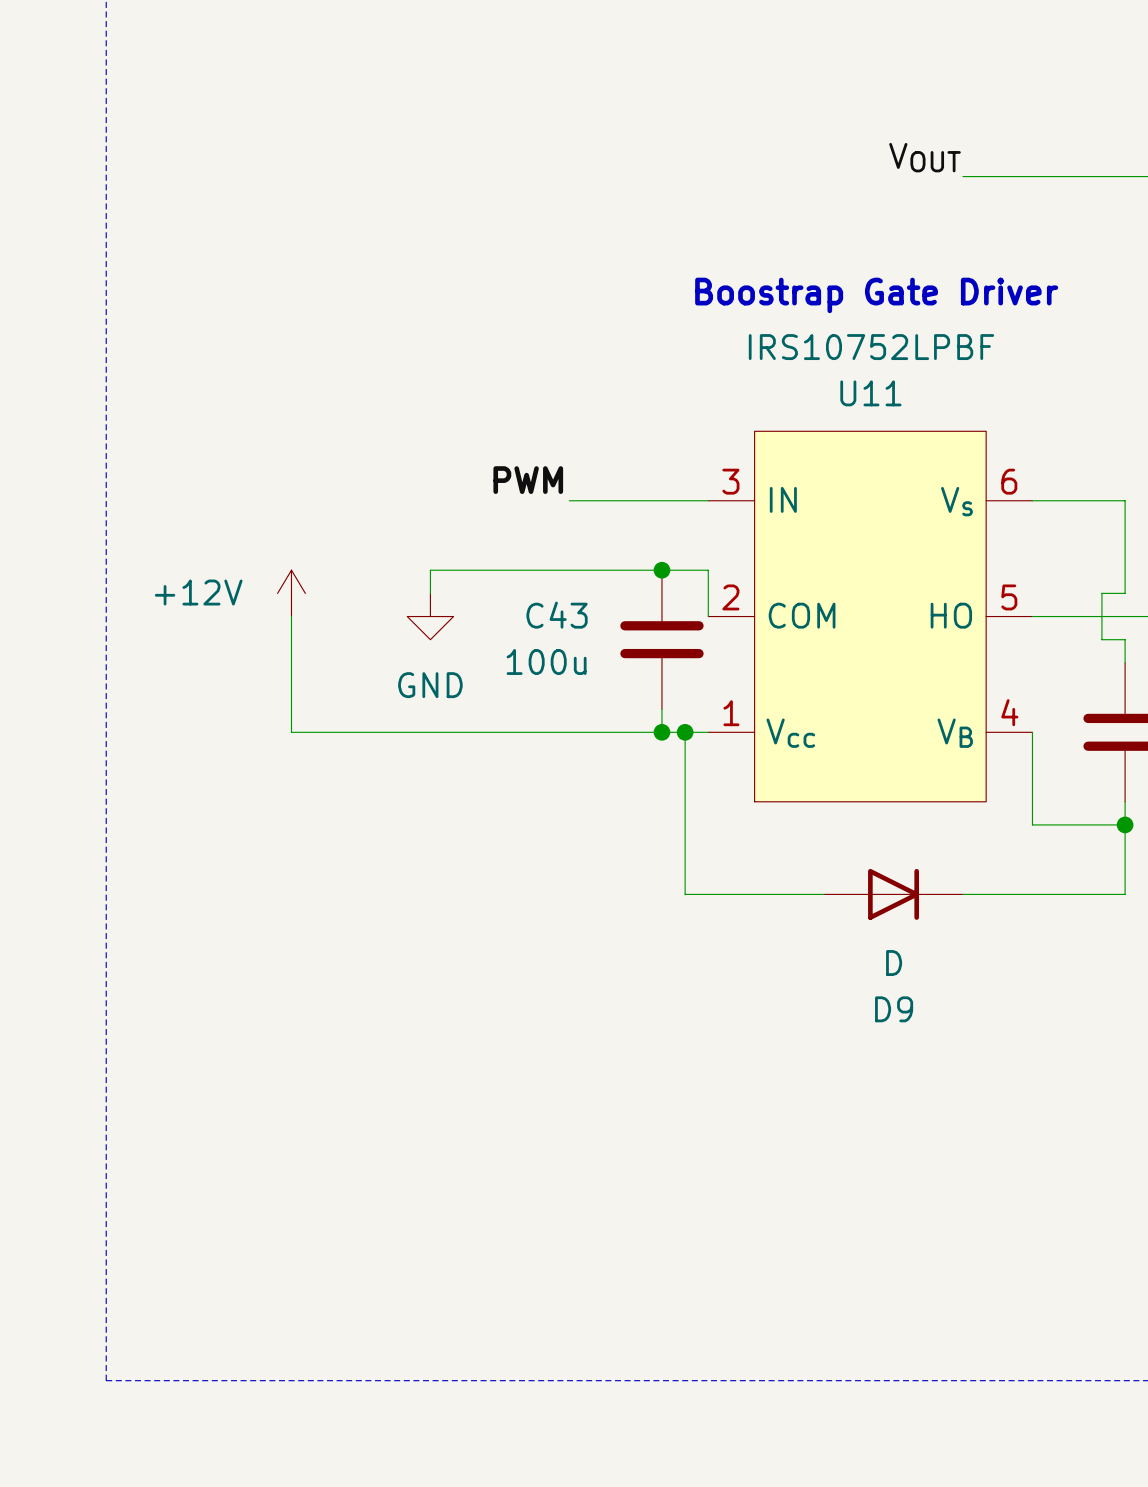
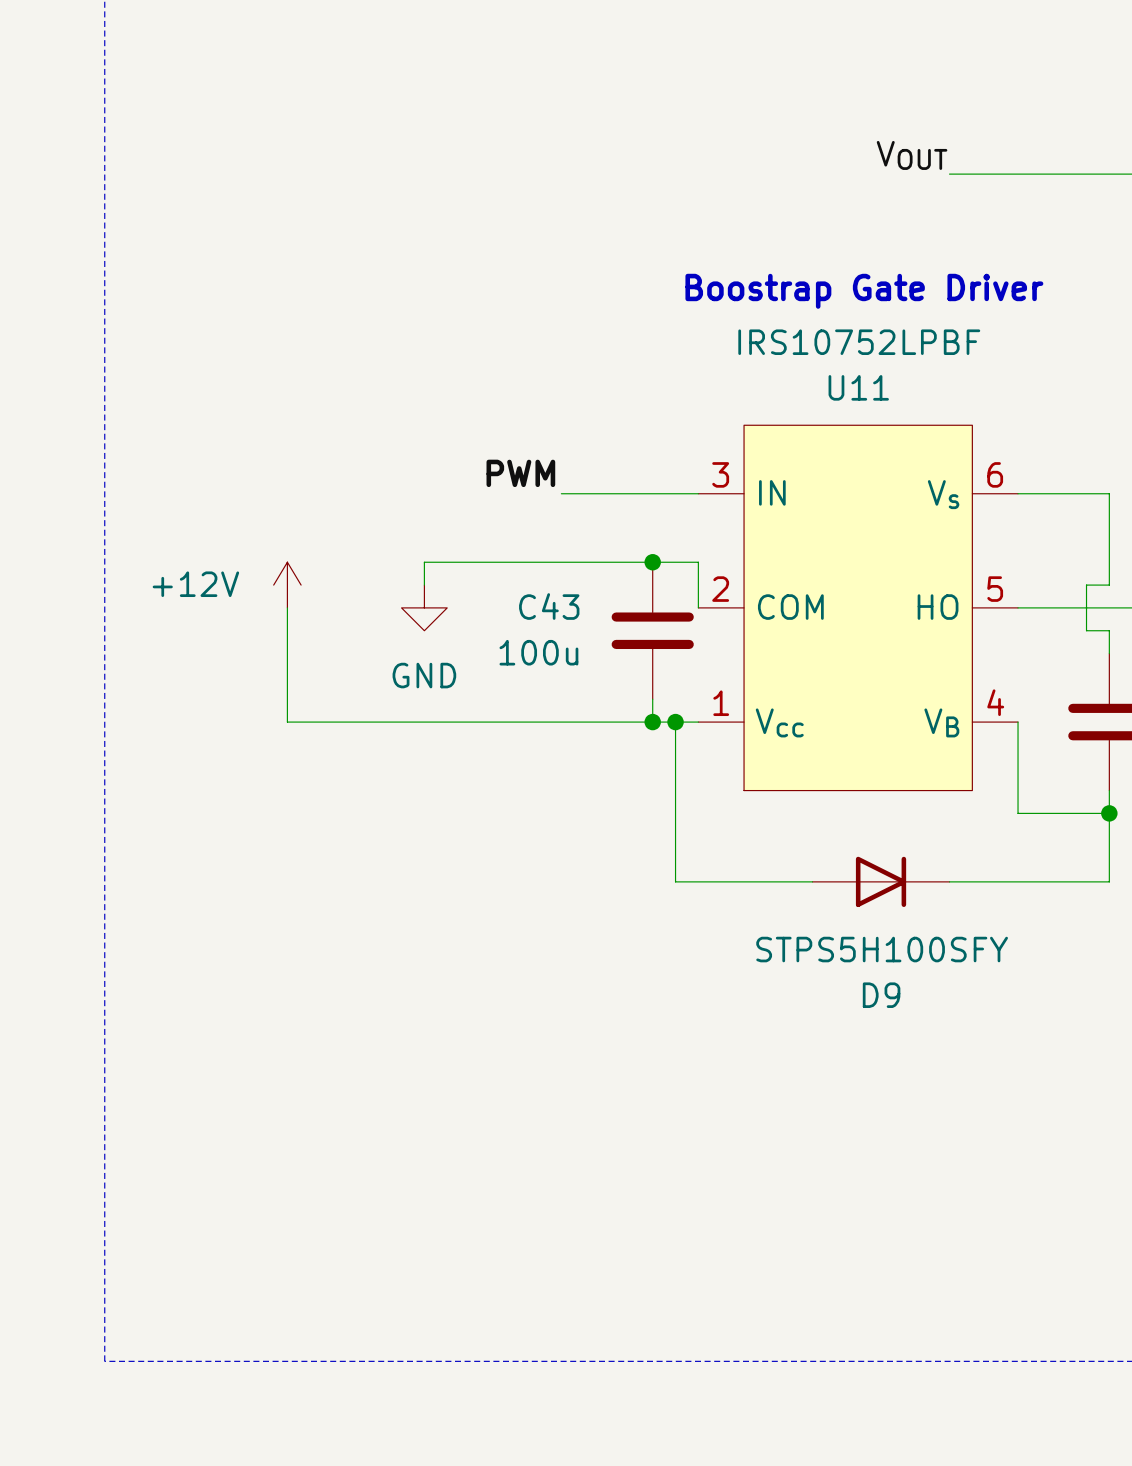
D9 value: D (894, 963) -> STPS5H100SFY (882, 949)

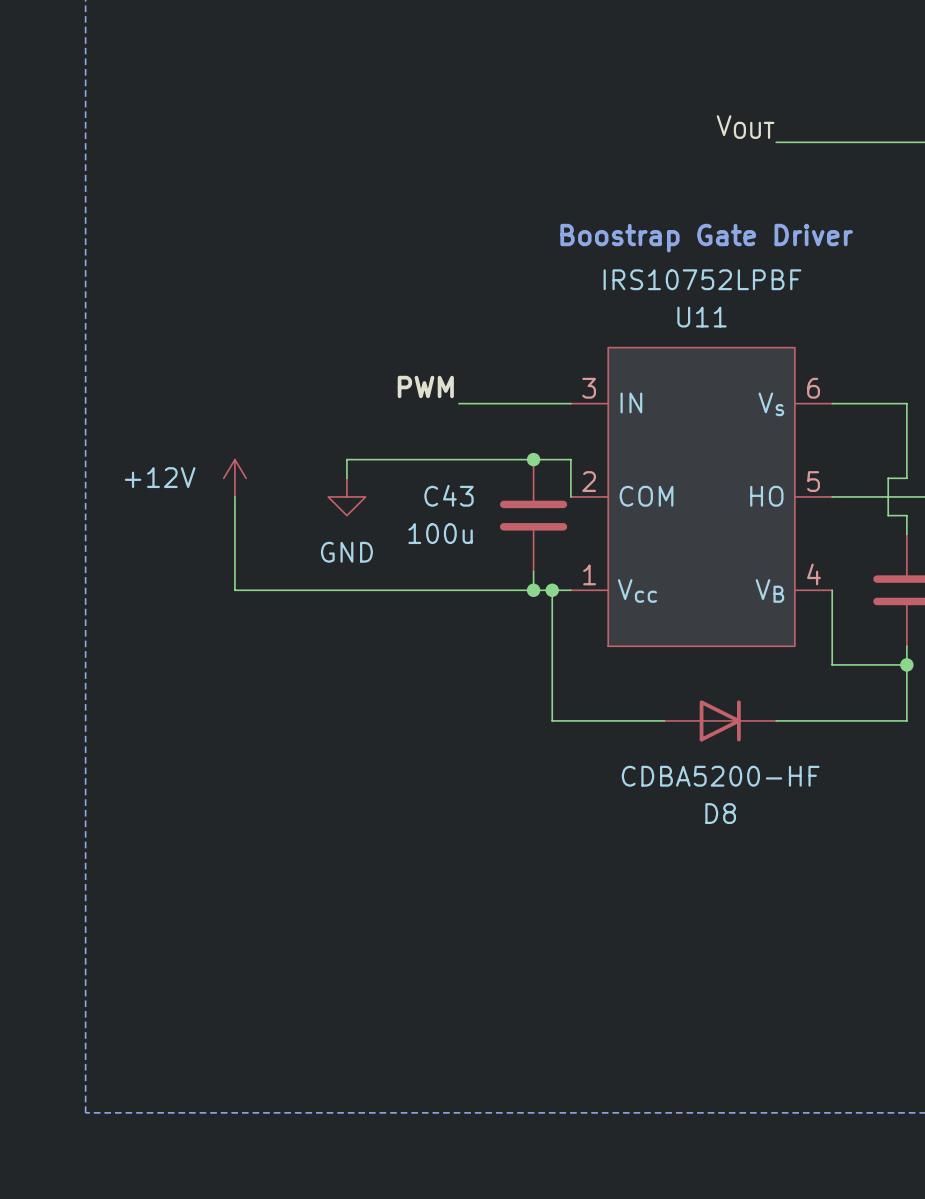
D9 value: STPS5H100SFY (882, 949) -> CDBA5200-HF (720, 776)
D9 name: D9 (881, 995) -> D8 (720, 813)

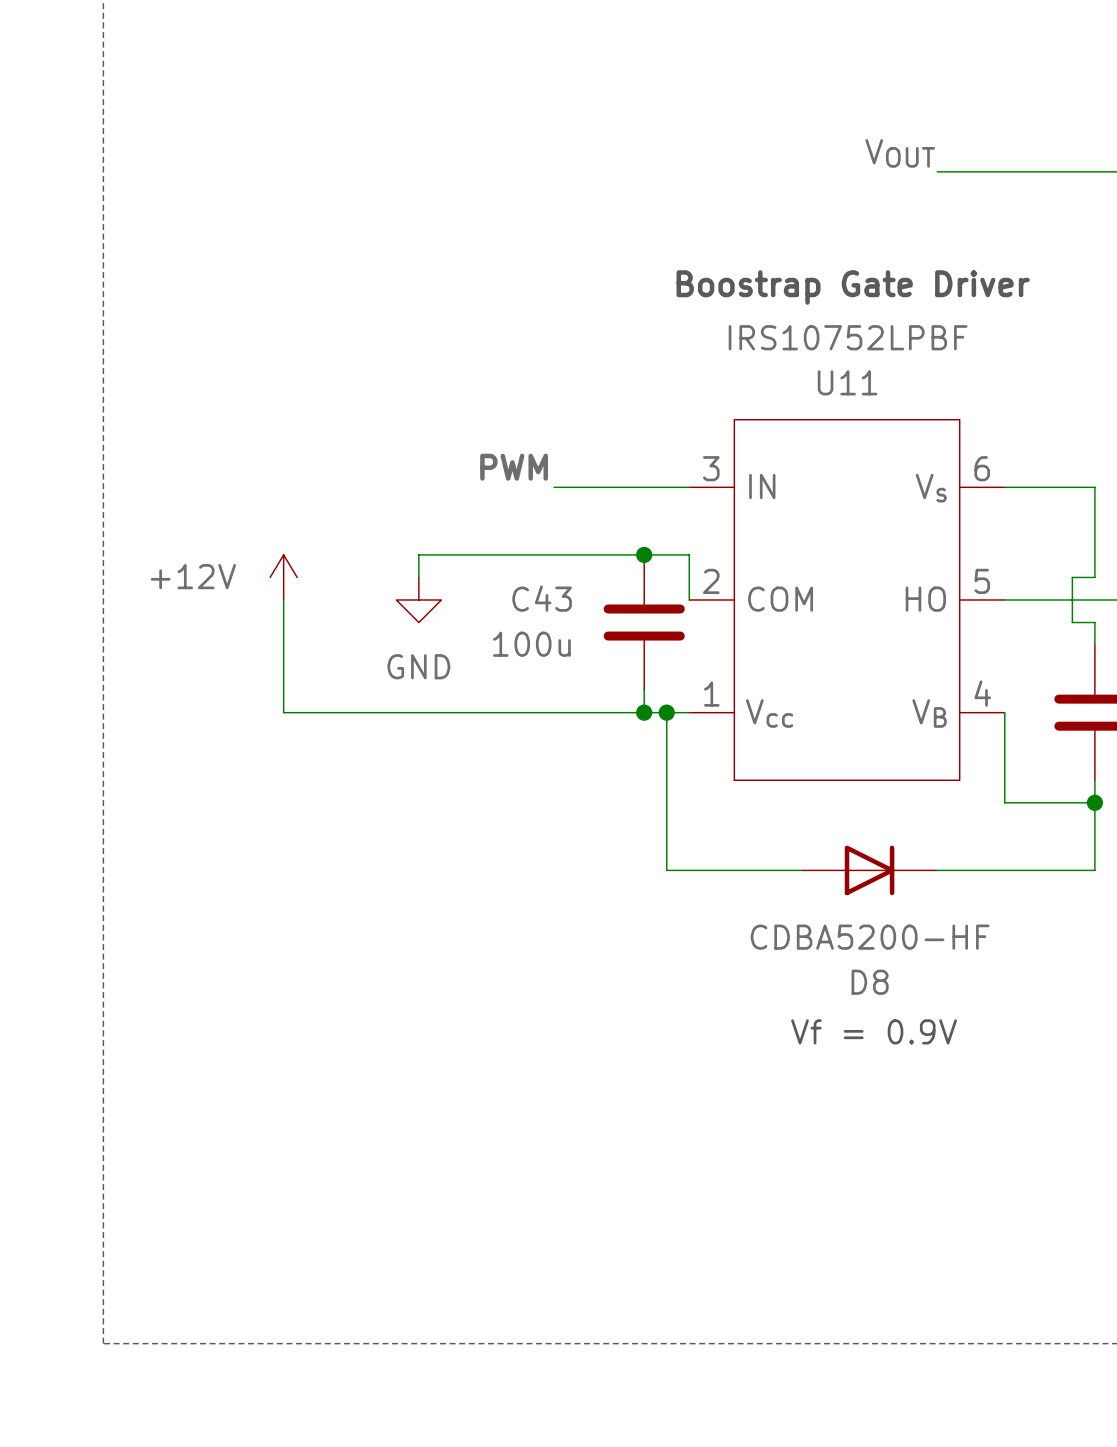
text: none -> Vf = 0.9V (874, 1031)

